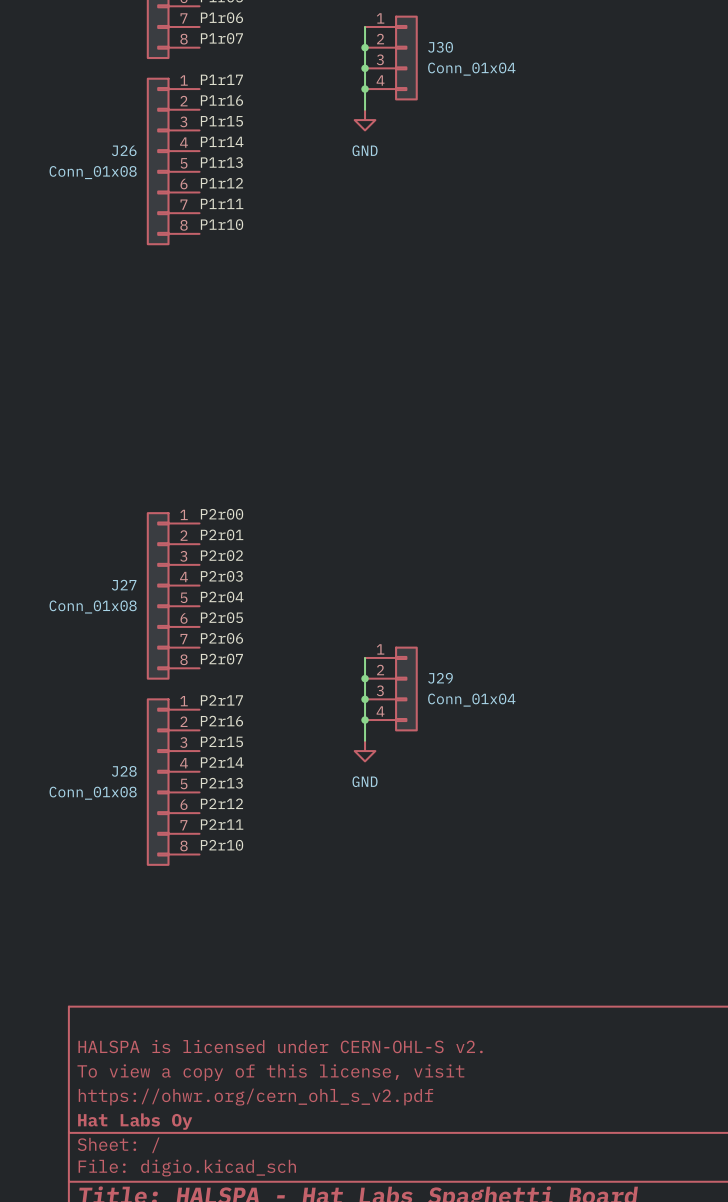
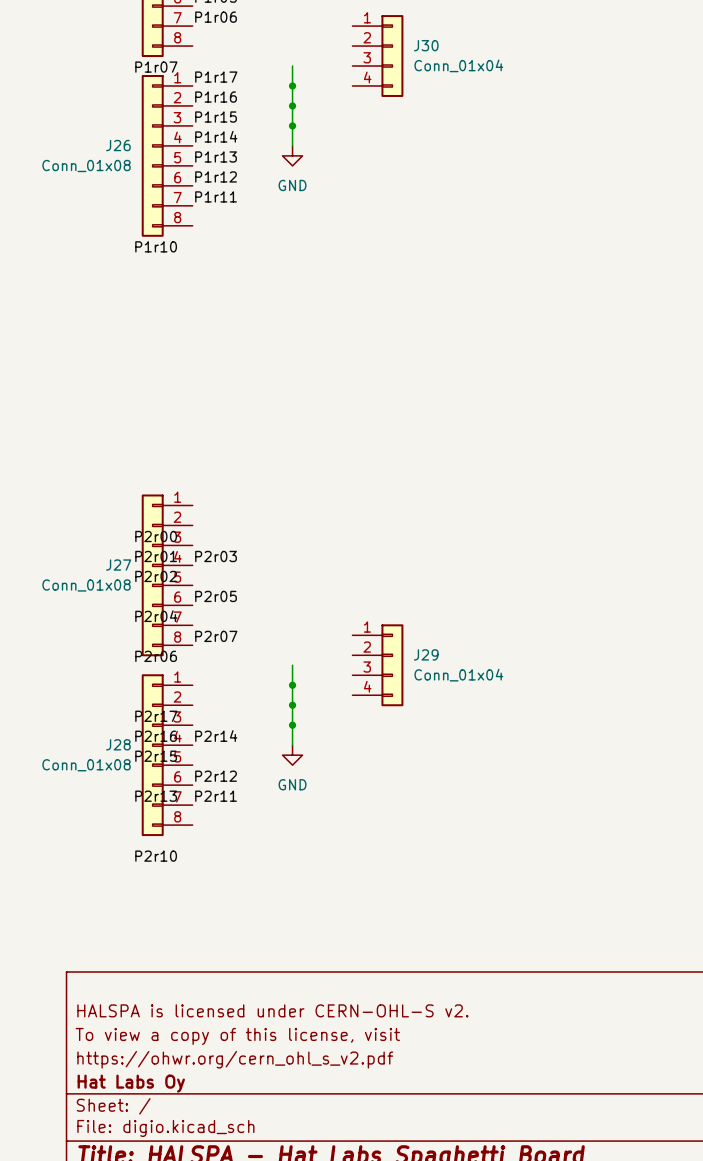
wire: (365, 26) (365, 109) -> (292, 66) (292, 145)
label position: P1r07 (221, 38) -> P1r07 (156, 67)
junction: (365, 47) -> none
junction: (365, 68) -> none
junction: none -> (292, 85)
junction: (365, 89) -> none
junction: none -> (292, 105)
power symbol position: GND (365, 120) -> GND (292, 155)
junction: none -> (292, 125)
label position: P1r10 (222, 224) -> P1r10 (156, 246)
label position: P2r00 (222, 514) -> P2r00 (156, 536)
label position: P2r01 (222, 534) -> P2r01 (156, 556)
label position: P2r02 (221, 555) -> P2r02 (156, 576)
label position: P2r04 (222, 597) -> P2r04 (156, 616)
label position: P2r06 (221, 638) -> P2r06 (156, 656)
wire: (365, 657) (365, 740) -> (292, 665) (292, 745)
junction: (365, 678) -> none
junction: (365, 699) -> none
label position: P2r17 (221, 700) -> P2r17 (156, 716)
junction: none -> (292, 685)
junction: (365, 720) -> none
label position: P2r16 (221, 721) -> P2r16 (156, 736)
junction: none -> (292, 705)
label position: P2r15 (221, 741) -> P2r15 (156, 756)
junction: none -> (292, 725)
power symbol position: GND (365, 751) -> GND (292, 755)
label position: P2r13 (221, 783) -> P2r13 (156, 796)
label position: P2r10 (222, 845) -> P2r10 (156, 856)

